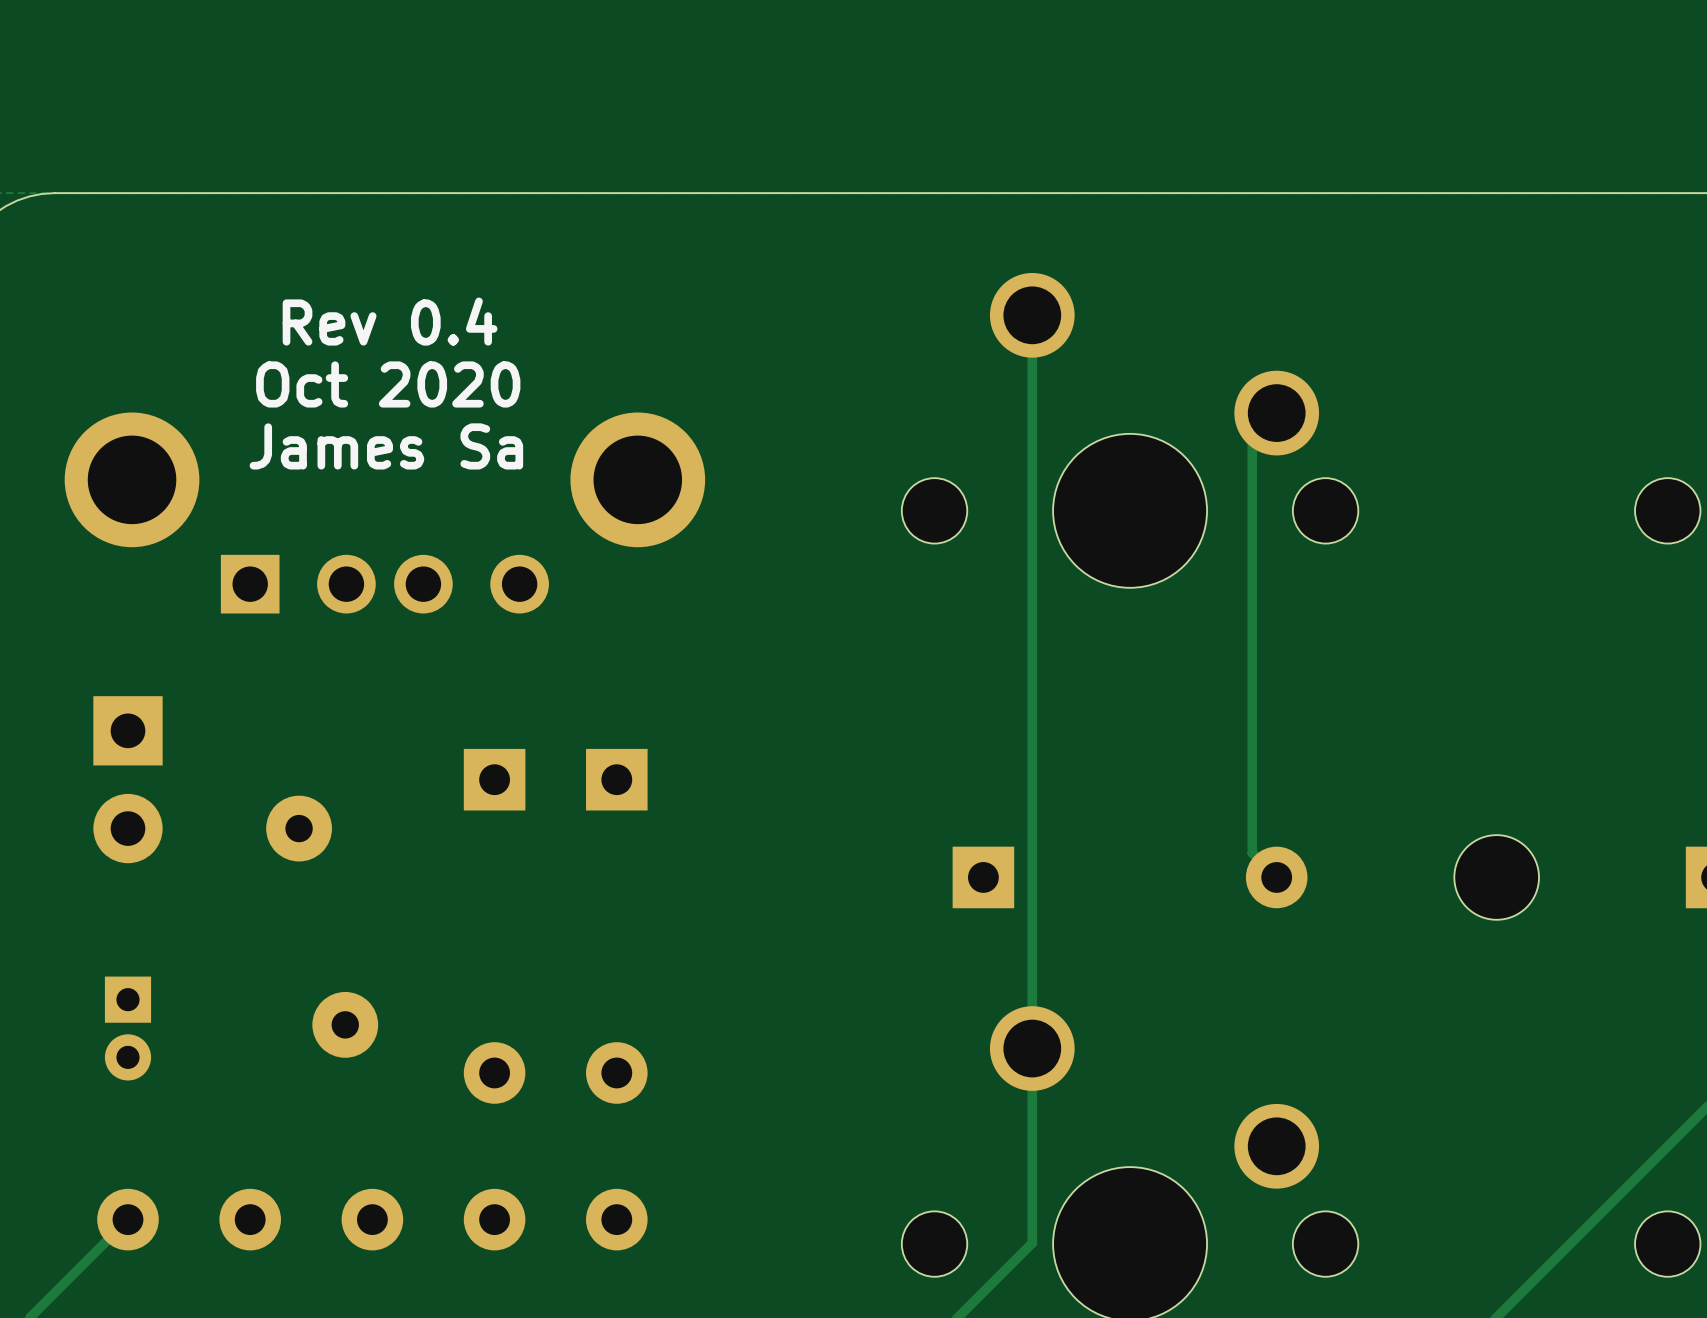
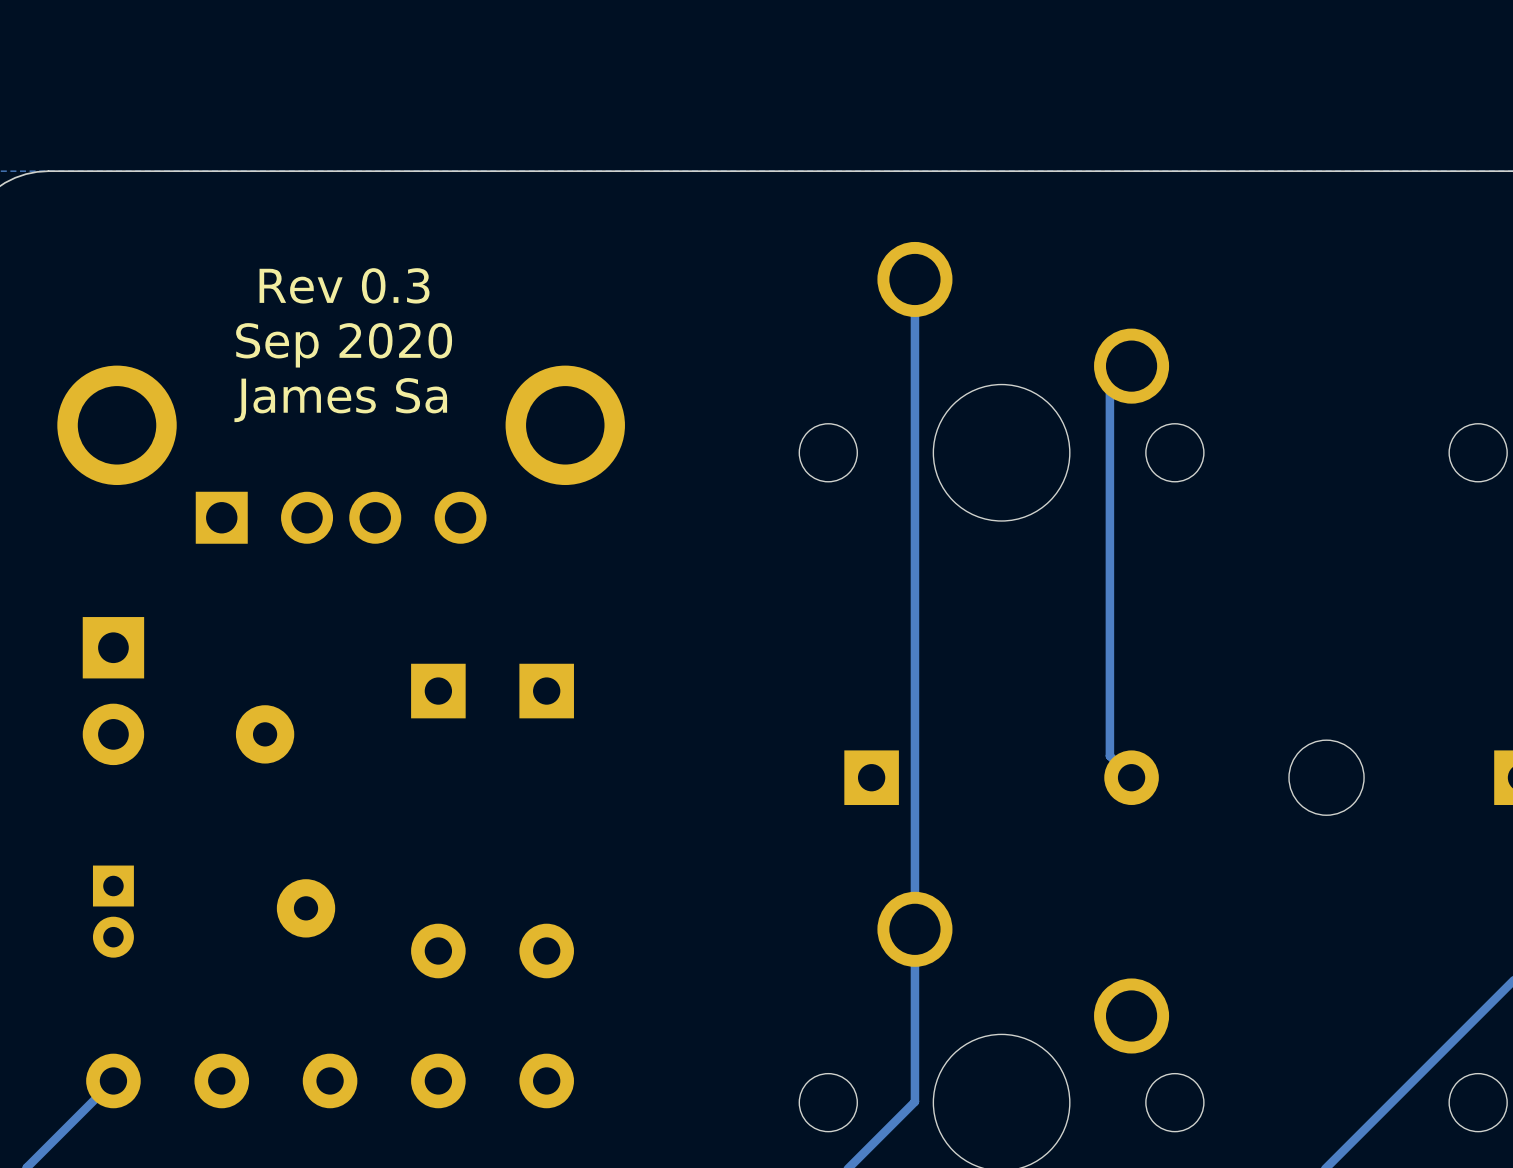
text: Rev 0.4 (390, 321) -> Rev 0.3 (344, 285)
text: Oct 2020 (388, 384) -> Sep 2020 (344, 345)

